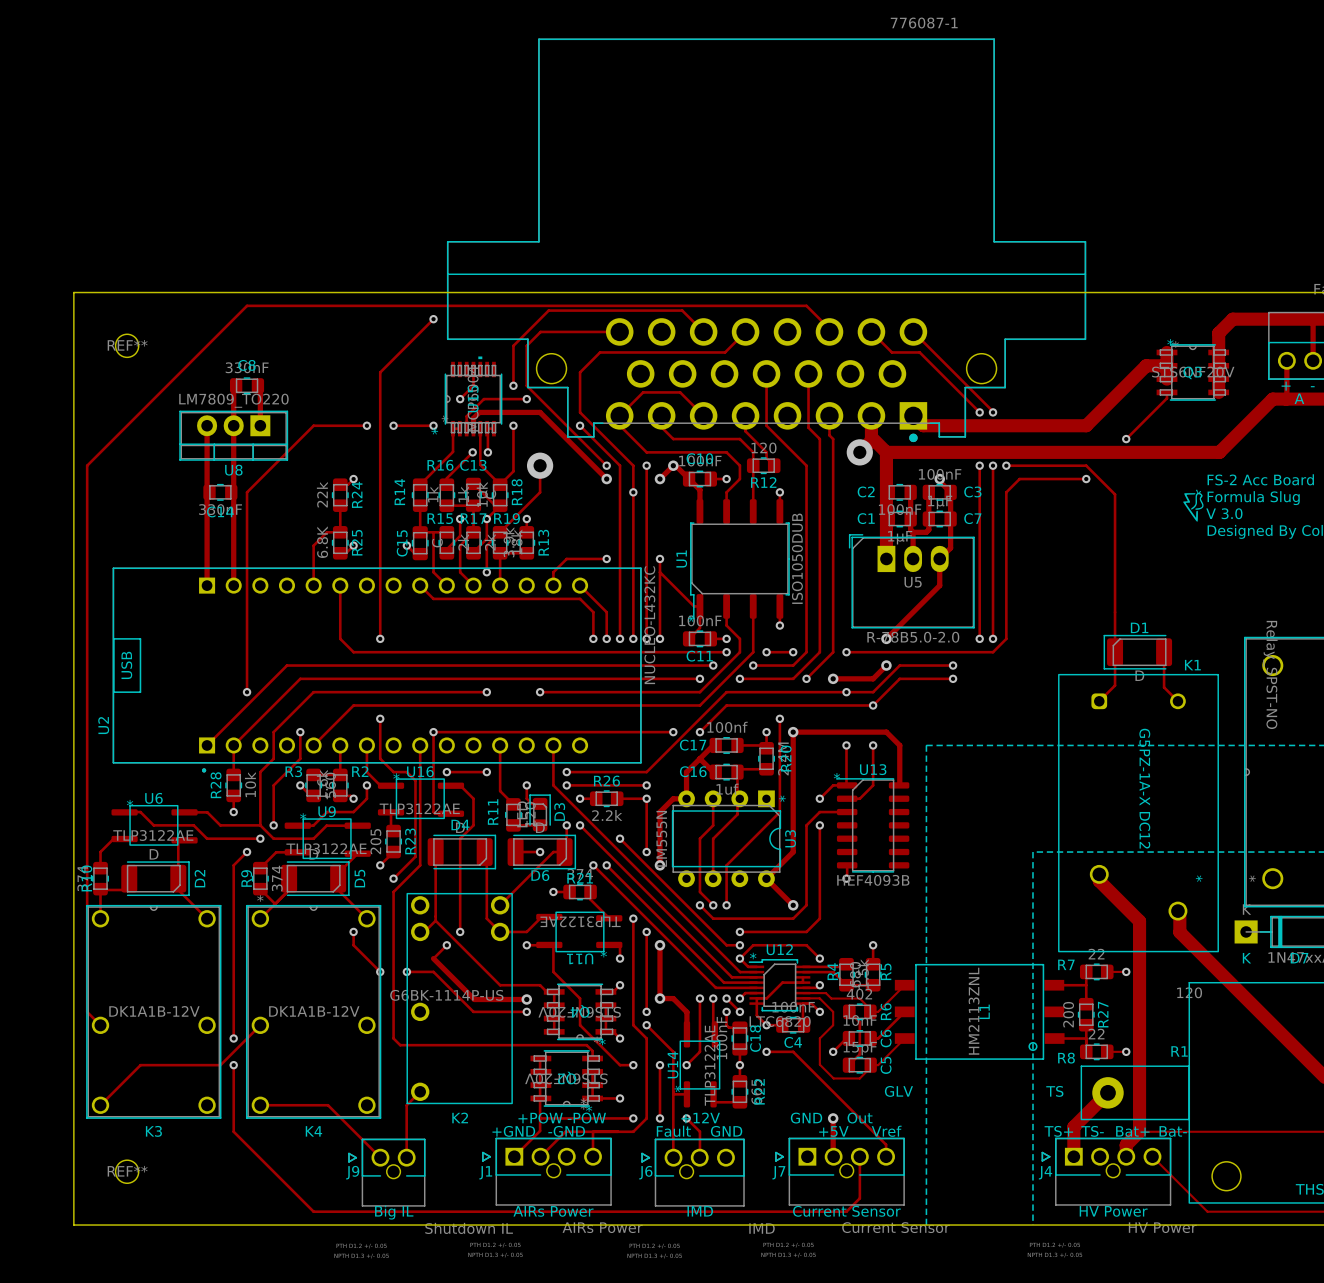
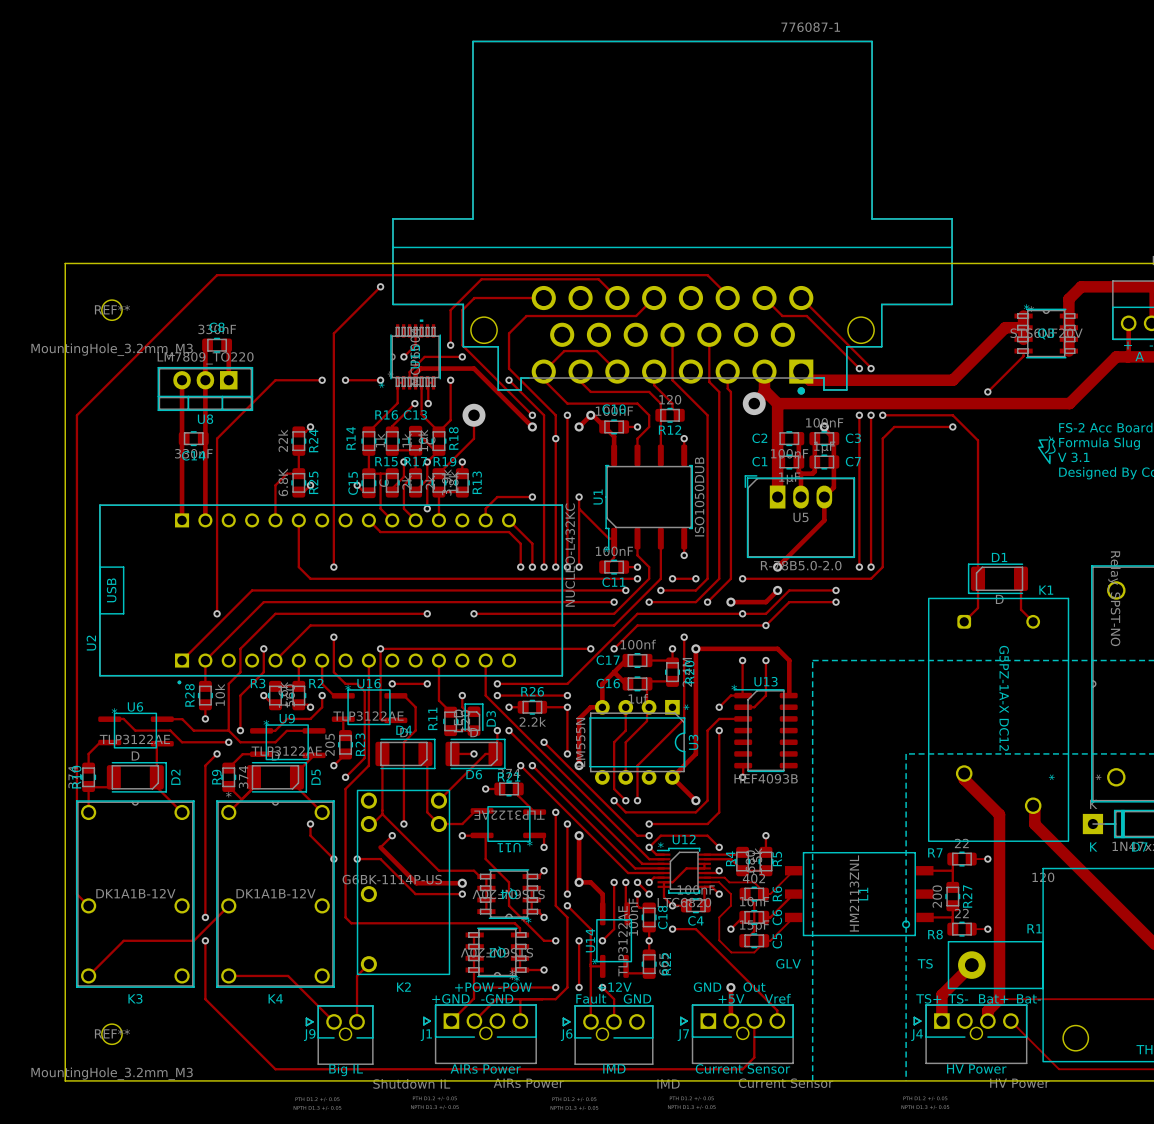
REF** value: none -> MountingHole_3.2mm_M3 (112, 349)
text: V 3.0 (1224, 513) -> V 3.1 (1073, 457)
REF** value: none -> MountingHole_3.2mm_M3 (112, 1073)

